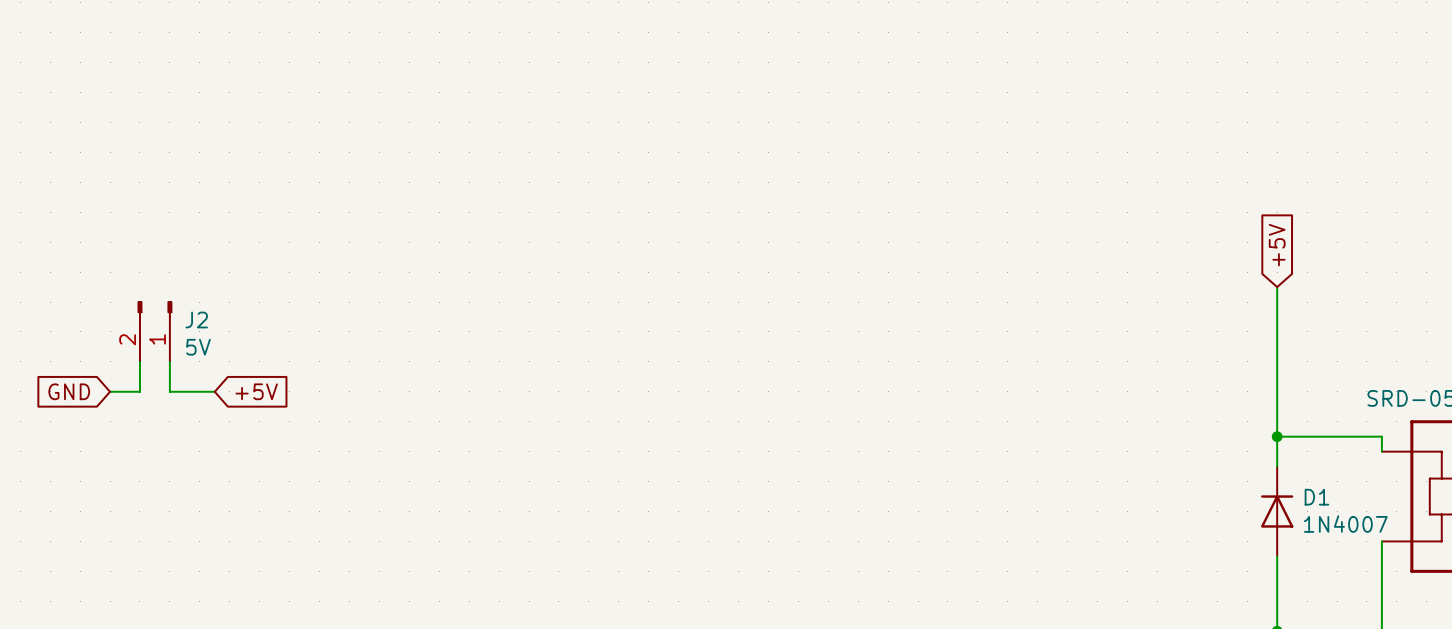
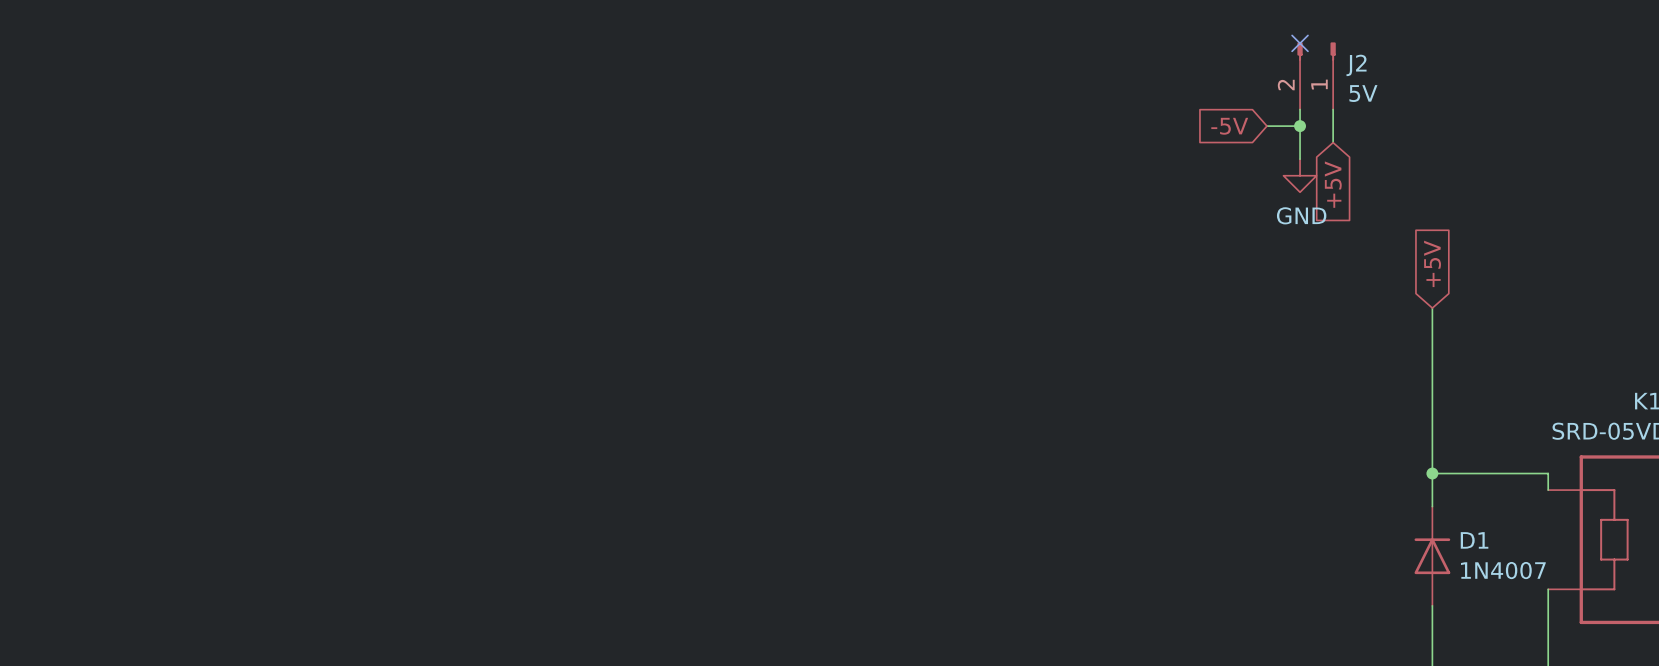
no-connect mark: none -> (1300, 43)
wire: none -> (1300, 109) (1300, 159)
wire: none -> (1333, 109) (1333, 142)
global label: none -> -5V (1229, 126)
wire: none -> (1266, 126) (1300, 126)
junction: none -> (1300, 126)
power symbol: none -> GND (1300, 175)
global label: none -> +5V (1333, 184)
J2 position: (154, 331) -> (1316, 75)
wire: (139, 361) (139, 391) (110, 391) -> none
wire: (169, 361) (169, 391) (214, 391) -> none
global label: GND (69, 391) -> none
global label: +5V (256, 391) -> none

